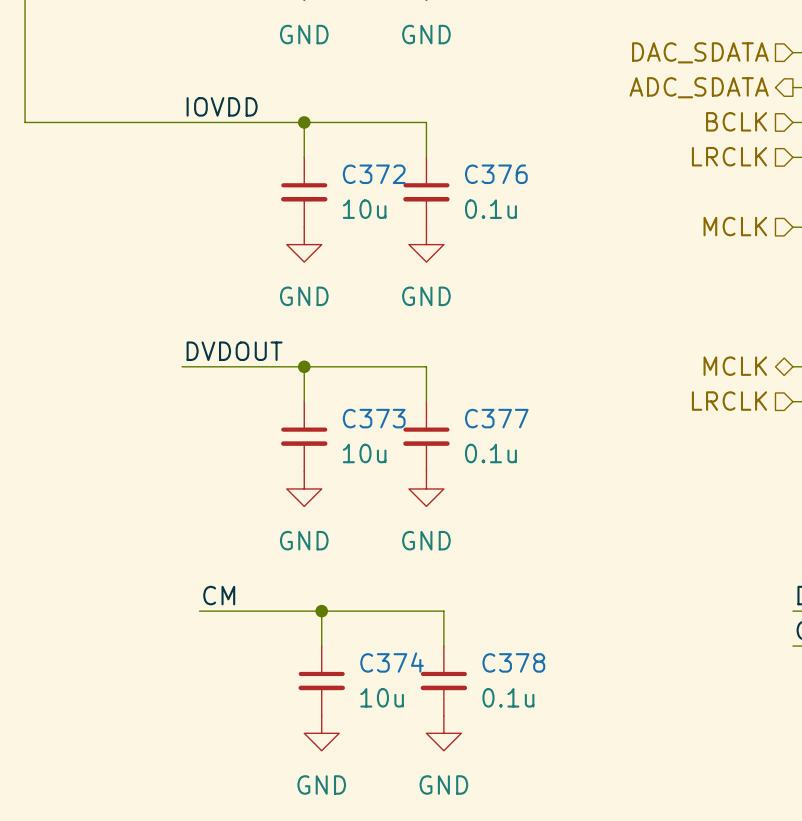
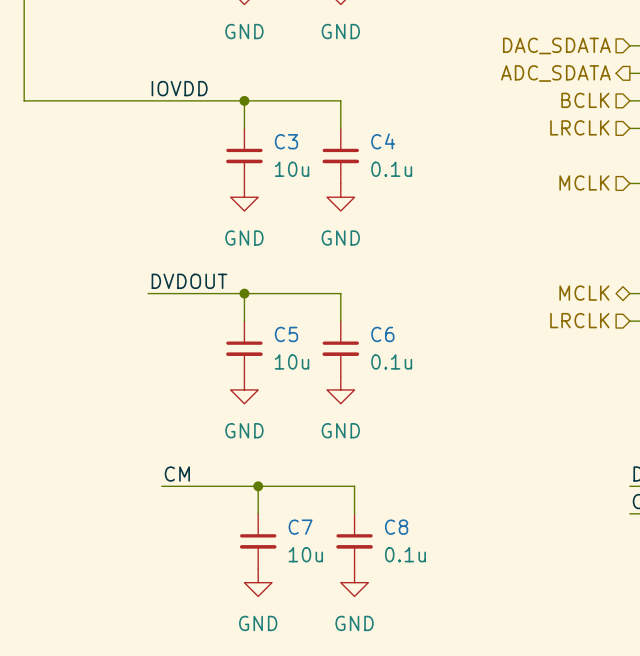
C372 name: C372 (374, 174) -> C3 (286, 141)
C376 name: C376 (496, 174) -> C4 (383, 141)
C373 name: C373 (374, 418) -> C5 (286, 334)
C377 name: C377 (496, 418) -> C6 (382, 334)
C374 name: C374 (392, 662) -> C7 (300, 527)
C378 name: C378 (513, 662) -> C8 (396, 527)

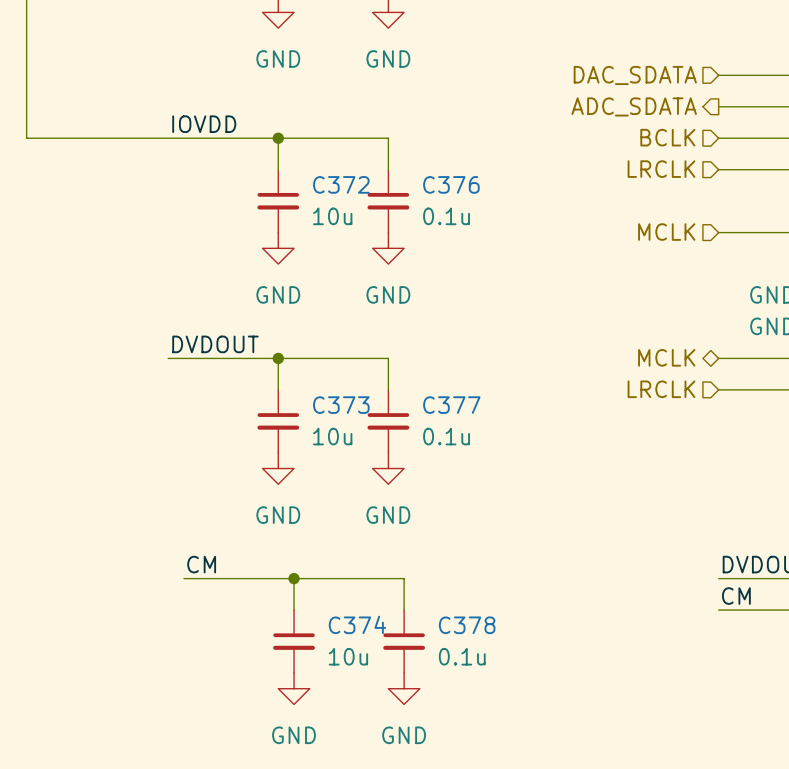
C3 name: C3 (286, 141) -> C372 (341, 184)
C4 name: C4 (383, 141) -> C376 (451, 184)
C5 name: C5 (286, 334) -> C373 (341, 405)
C6 name: C6 (382, 334) -> C377 (451, 405)
C7 name: C7 (300, 527) -> C374 (357, 624)
C8 name: C8 (396, 527) -> C378 (467, 625)

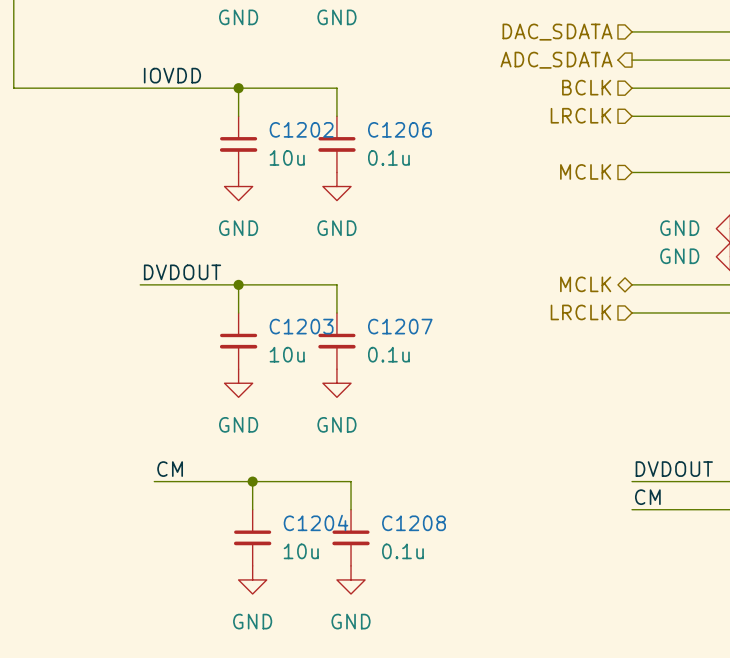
C372 name: C372 (341, 184) -> C1202 (301, 129)
C376 name: C376 (451, 184) -> C1206 (399, 129)
C373 name: C373 (341, 405) -> C1203 (301, 326)
C377 name: C377 (451, 405) -> C1207 (400, 326)
C374 name: C374 (357, 624) -> C1204 (315, 522)
C378 name: C378 (467, 625) -> C1208 (414, 523)

